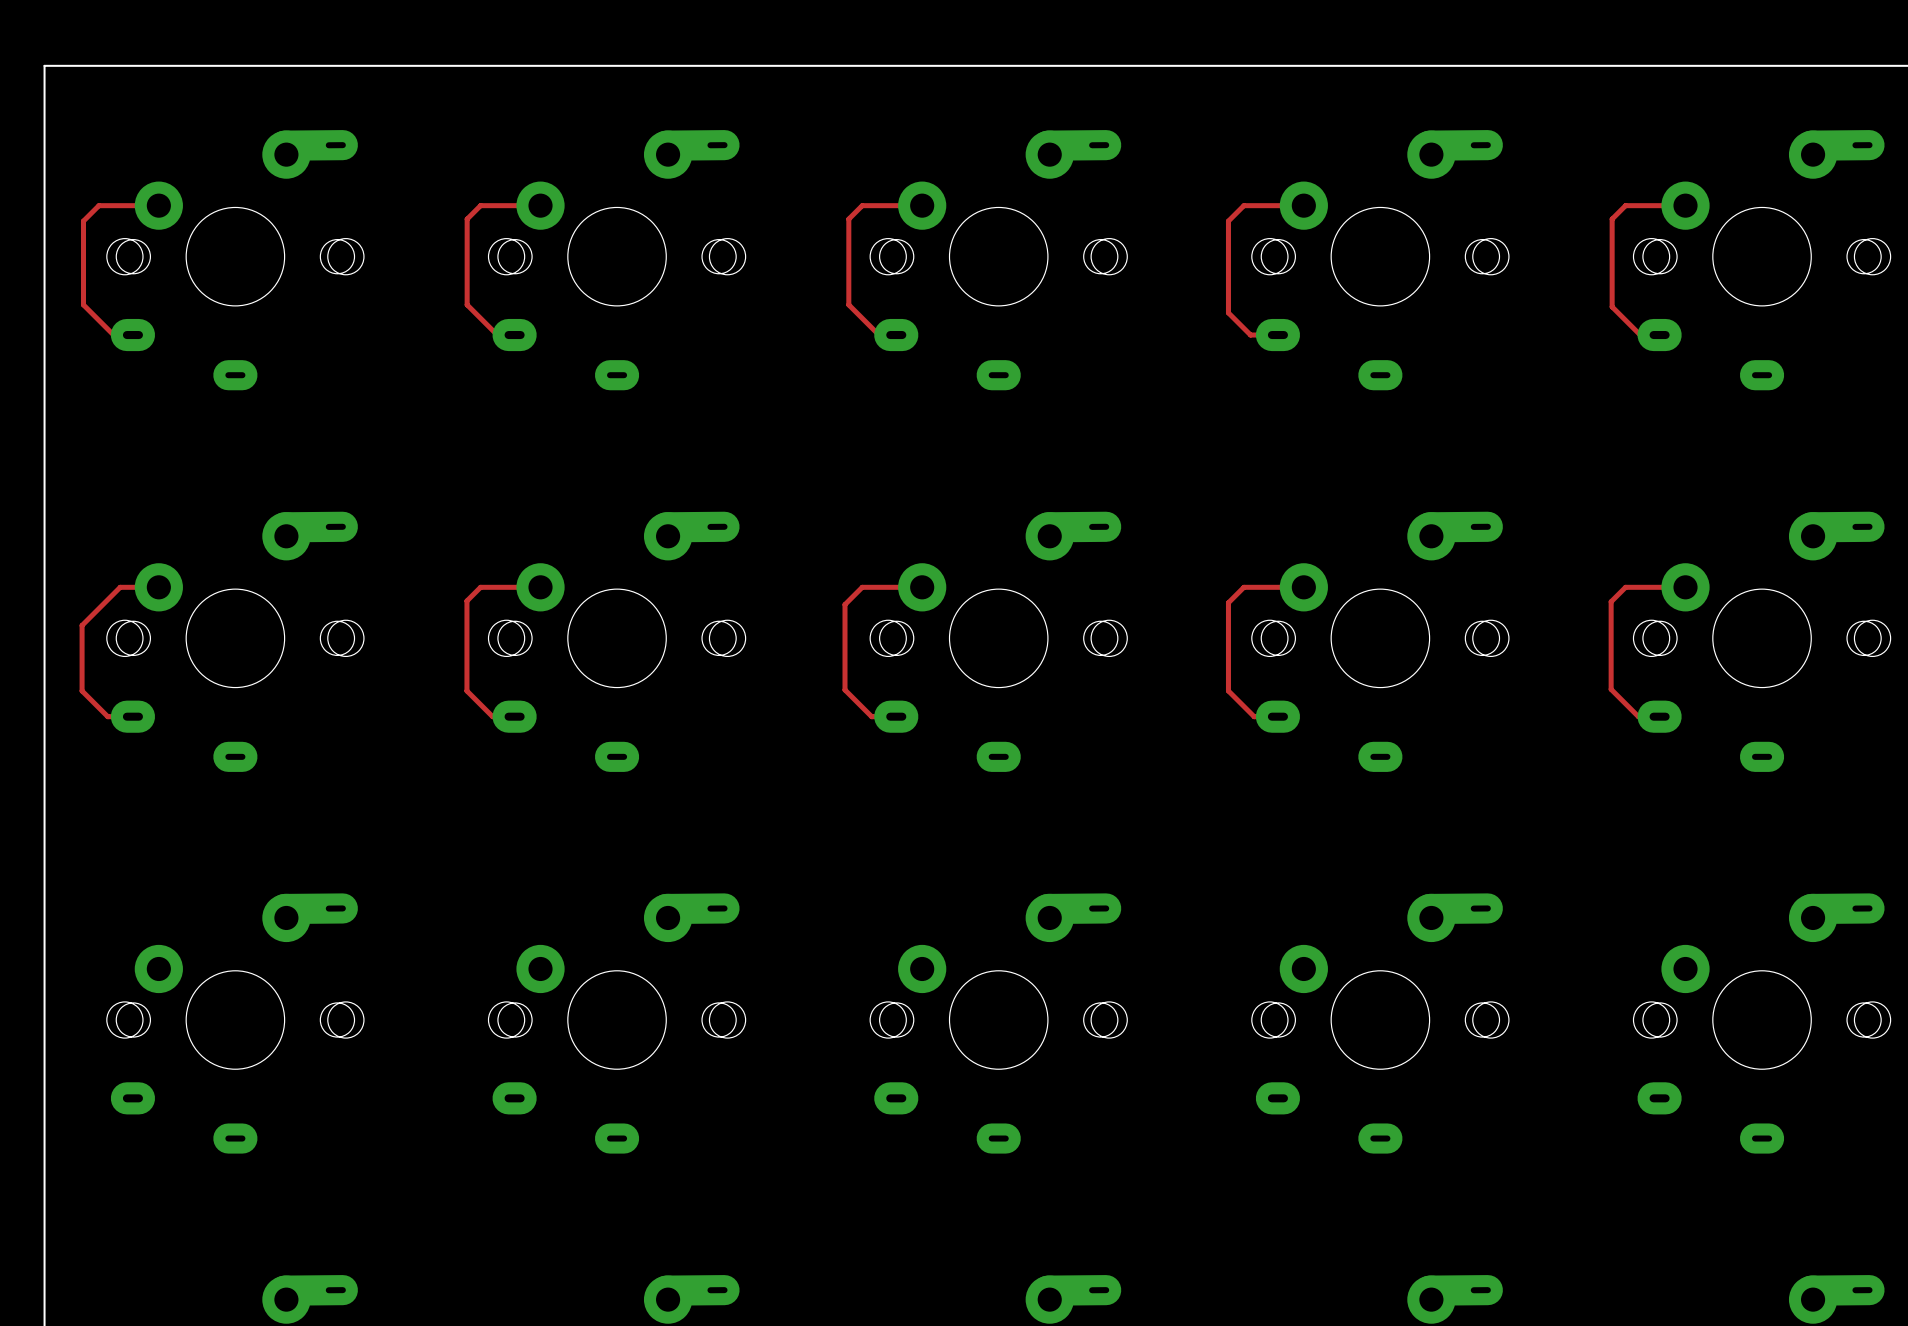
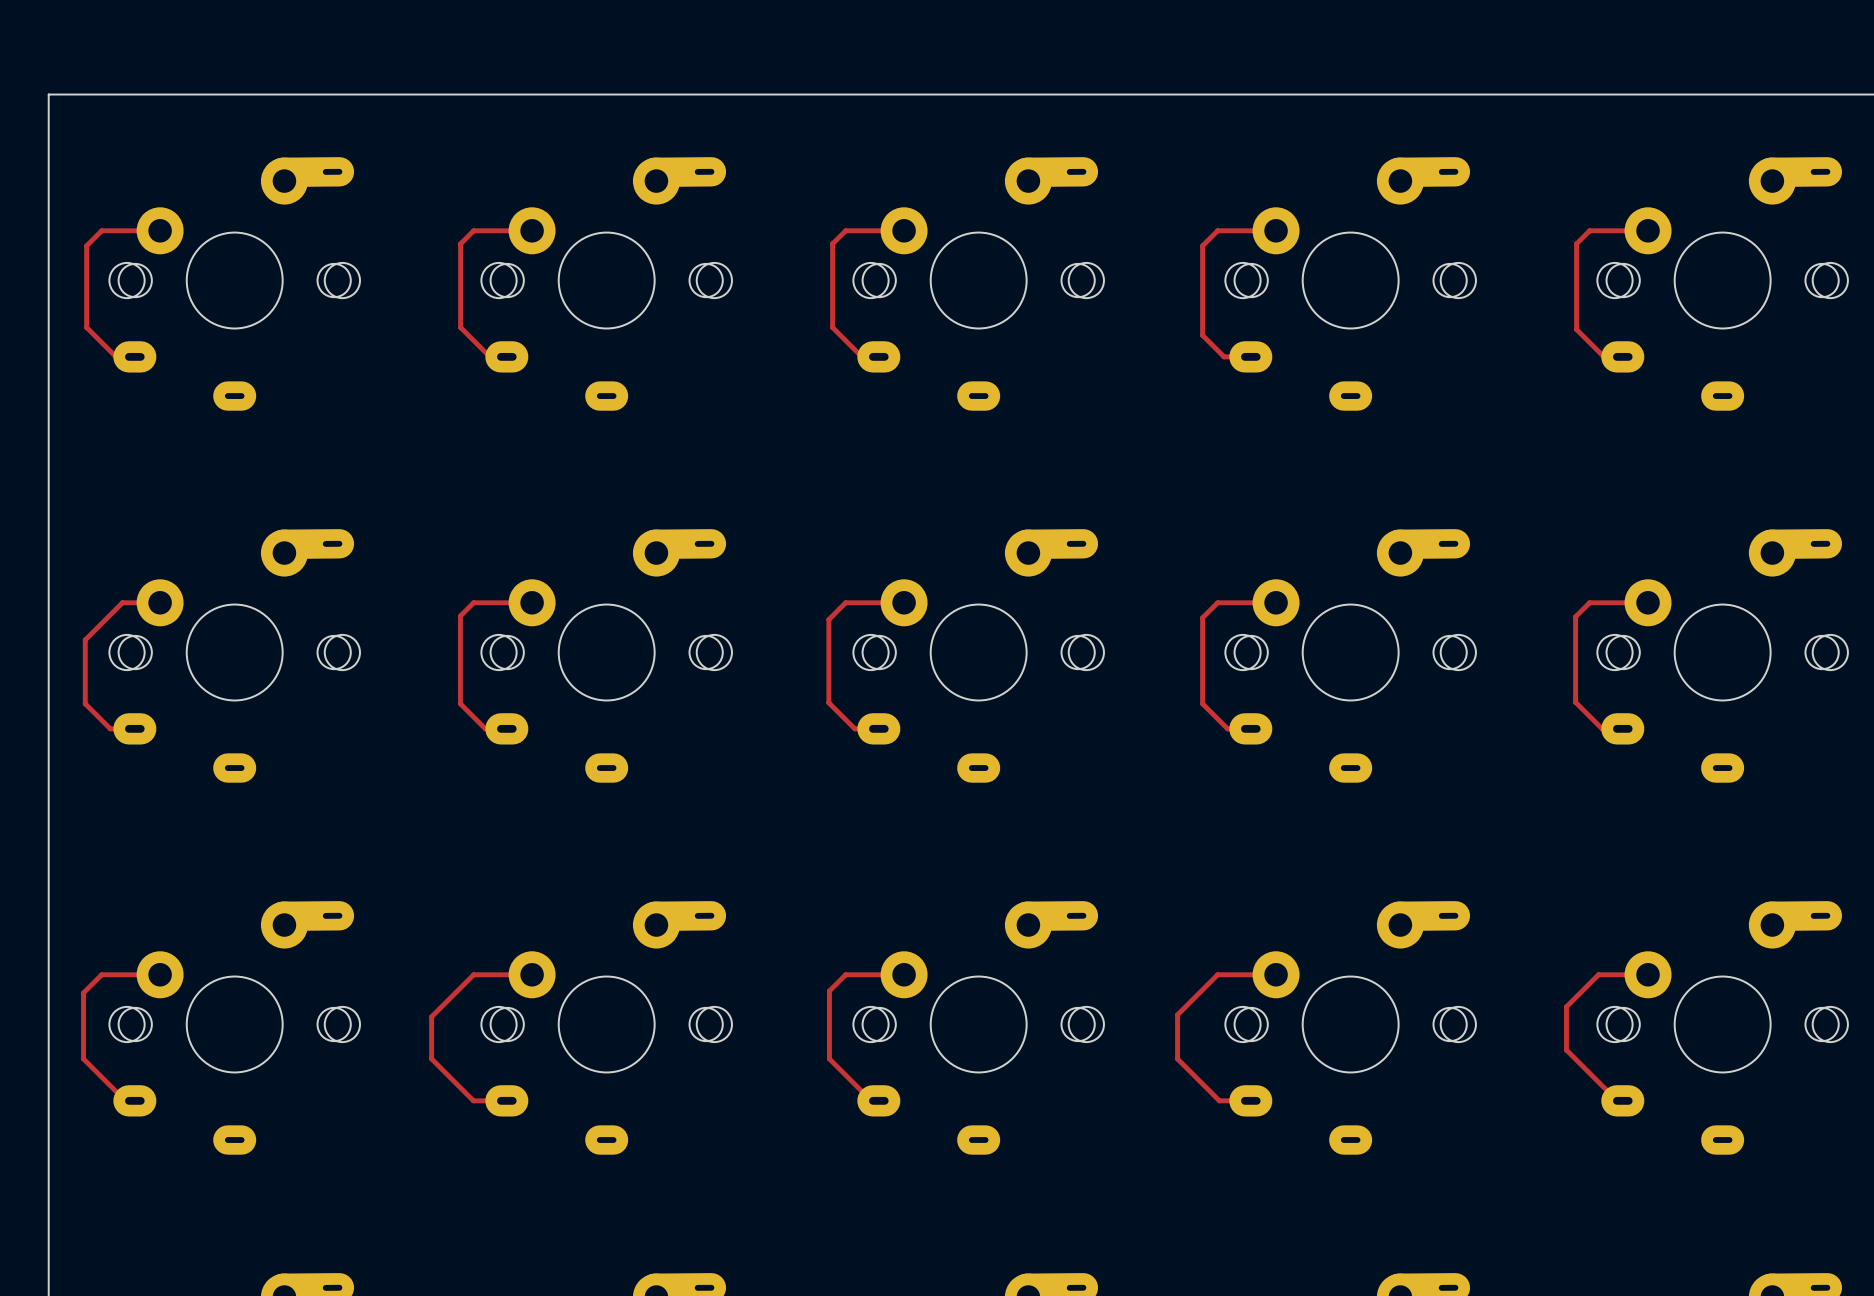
track: none -> (160, 974) (101, 974) (83, 992) (83, 1058) (133, 1108) (134, 1100)
track: none -> (532, 974) (473, 974) (431, 1016) (431, 1058) (473, 1100) (506, 1100)
track: none -> (904, 974) (845, 974) (829, 991) (829, 1058) (871, 1100) (878, 1100)
track: none -> (1276, 974) (1217, 974) (1177, 1014) (1177, 1058) (1219, 1100) (1250, 1100)
track: none -> (1648, 974) (1598, 974) (1566, 1006) (1566, 1050) (1617, 1100) (1622, 1100)

